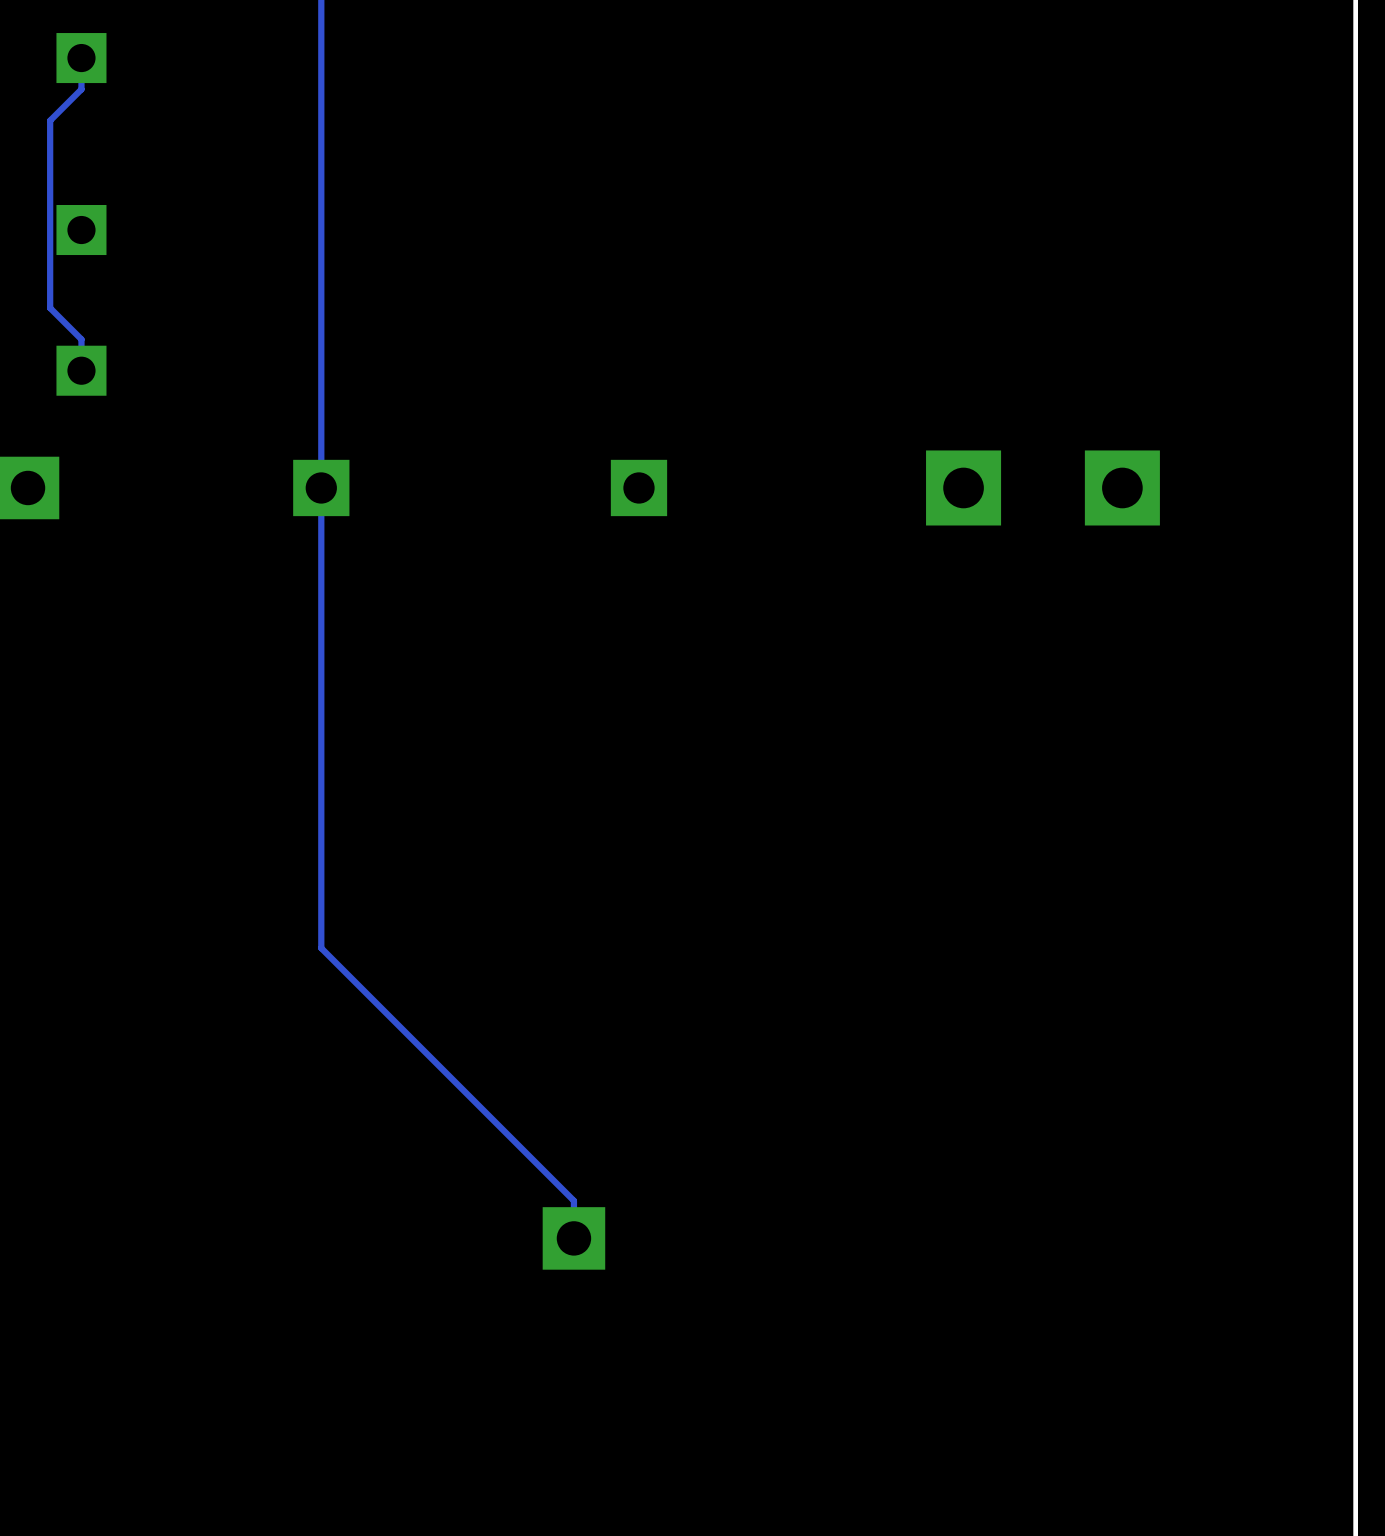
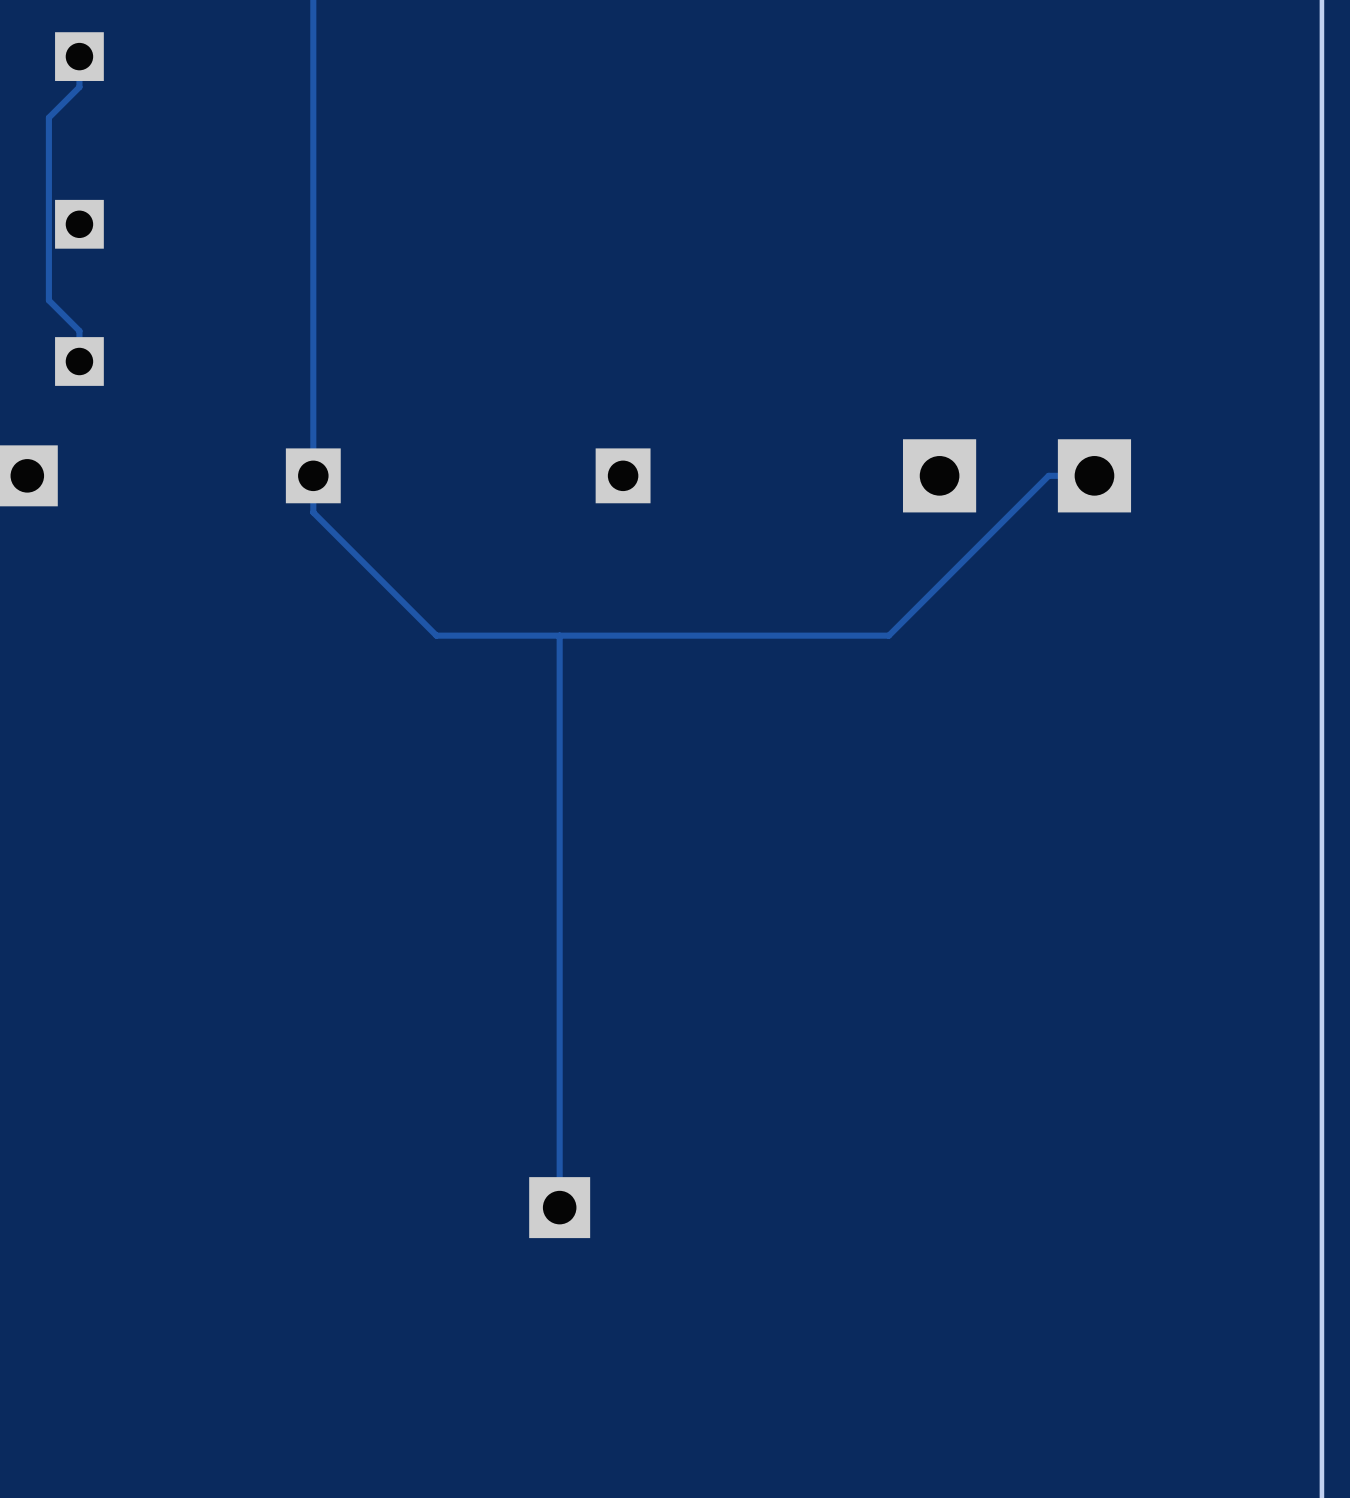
track: none -> (1094, 475) (1048, 475) (888, 635) (436, 635) (313, 512)
track: (321, 525) (321, 948) (573, 1200) -> (559, 635) (559, 1170)

